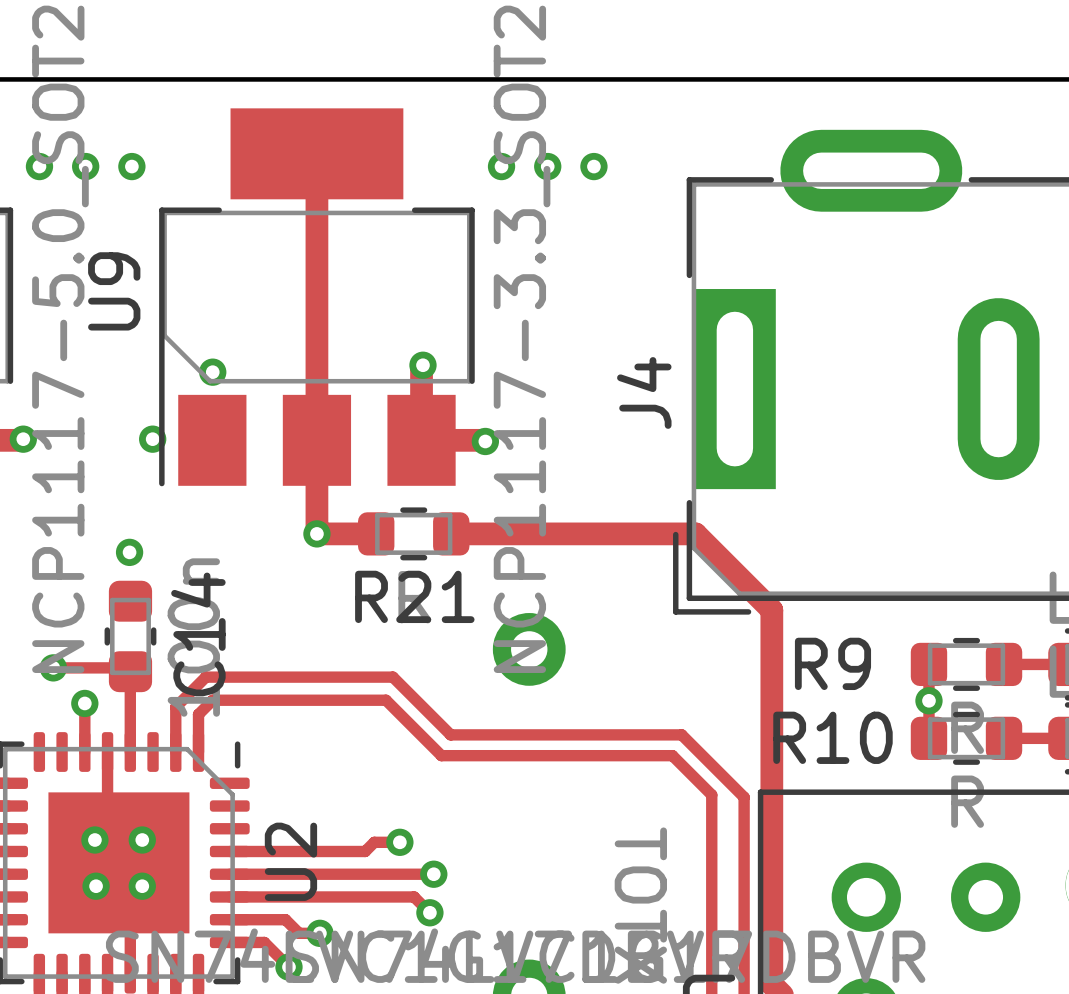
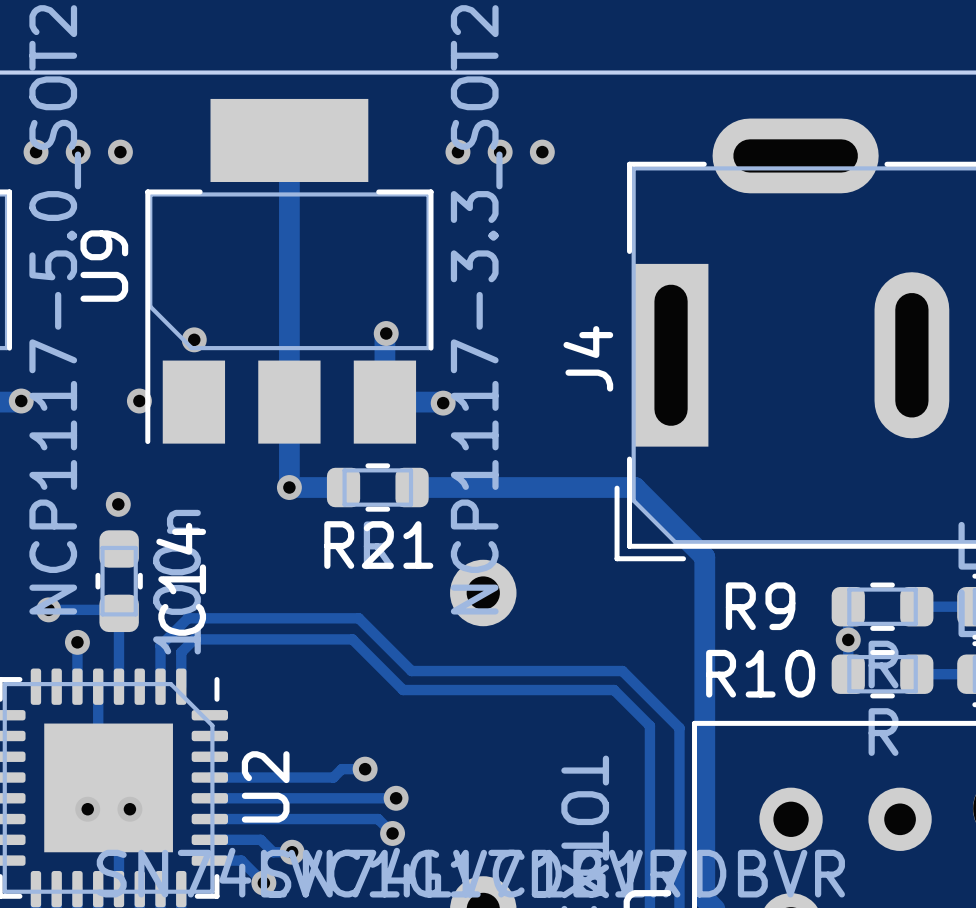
via: (94, 840) -> none
via: (142, 840) -> none

